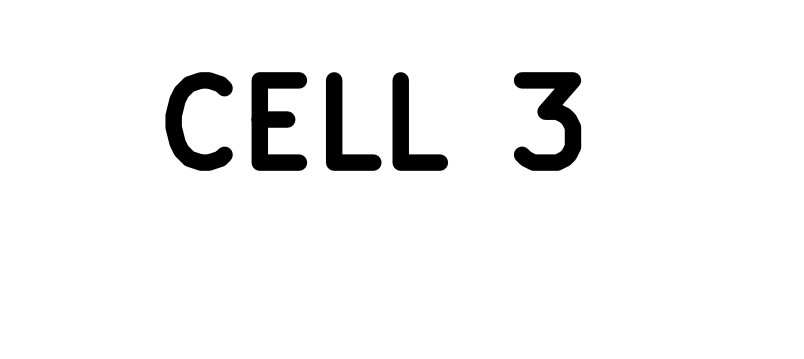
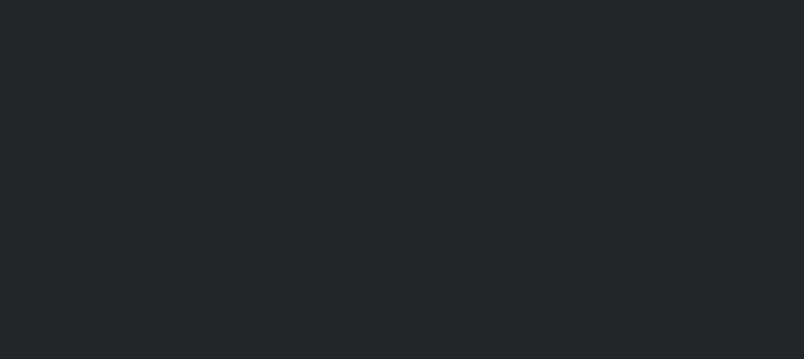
text: CELL 3 (373, 121) -> none

